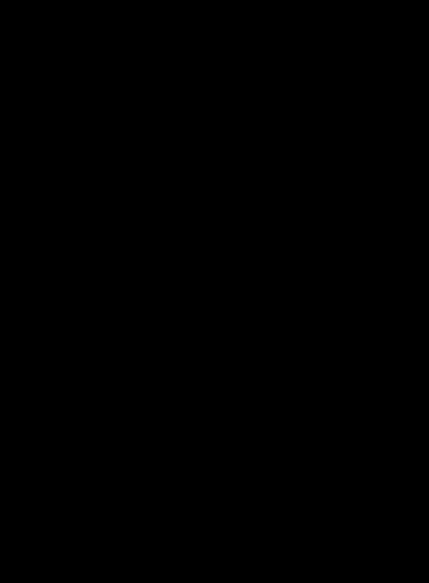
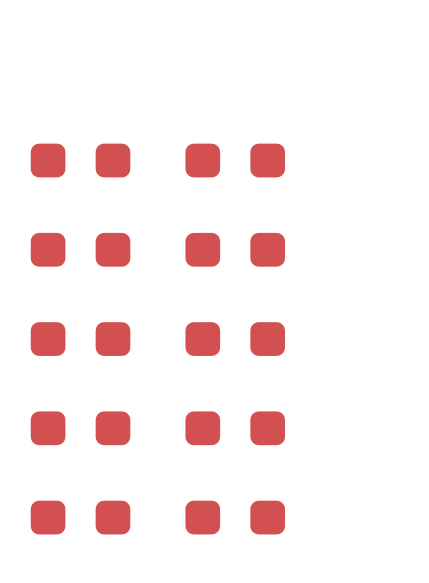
part: none -> (80, 160)
part: none -> (235, 160)
part: none -> (80, 249)
part: none -> (235, 249)
part: none -> (80, 339)
part: none -> (235, 339)
part: none -> (80, 428)
part: none -> (235, 428)
part: none -> (80, 517)
part: none -> (235, 517)

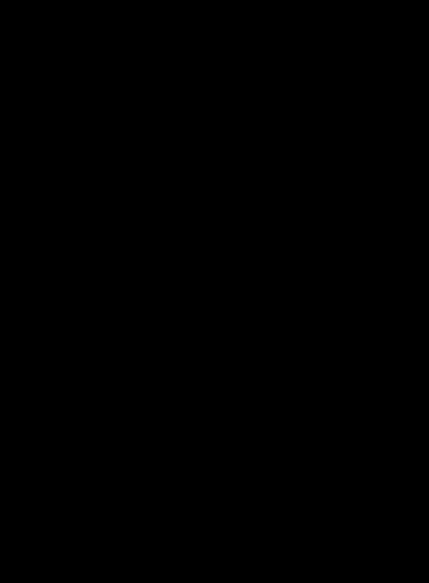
part: (80, 160) -> none
part: (235, 160) -> none
part: (80, 249) -> none
part: (235, 249) -> none
part: (80, 339) -> none
part: (235, 339) -> none
part: (80, 428) -> none
part: (235, 428) -> none
part: (80, 517) -> none
part: (235, 517) -> none

